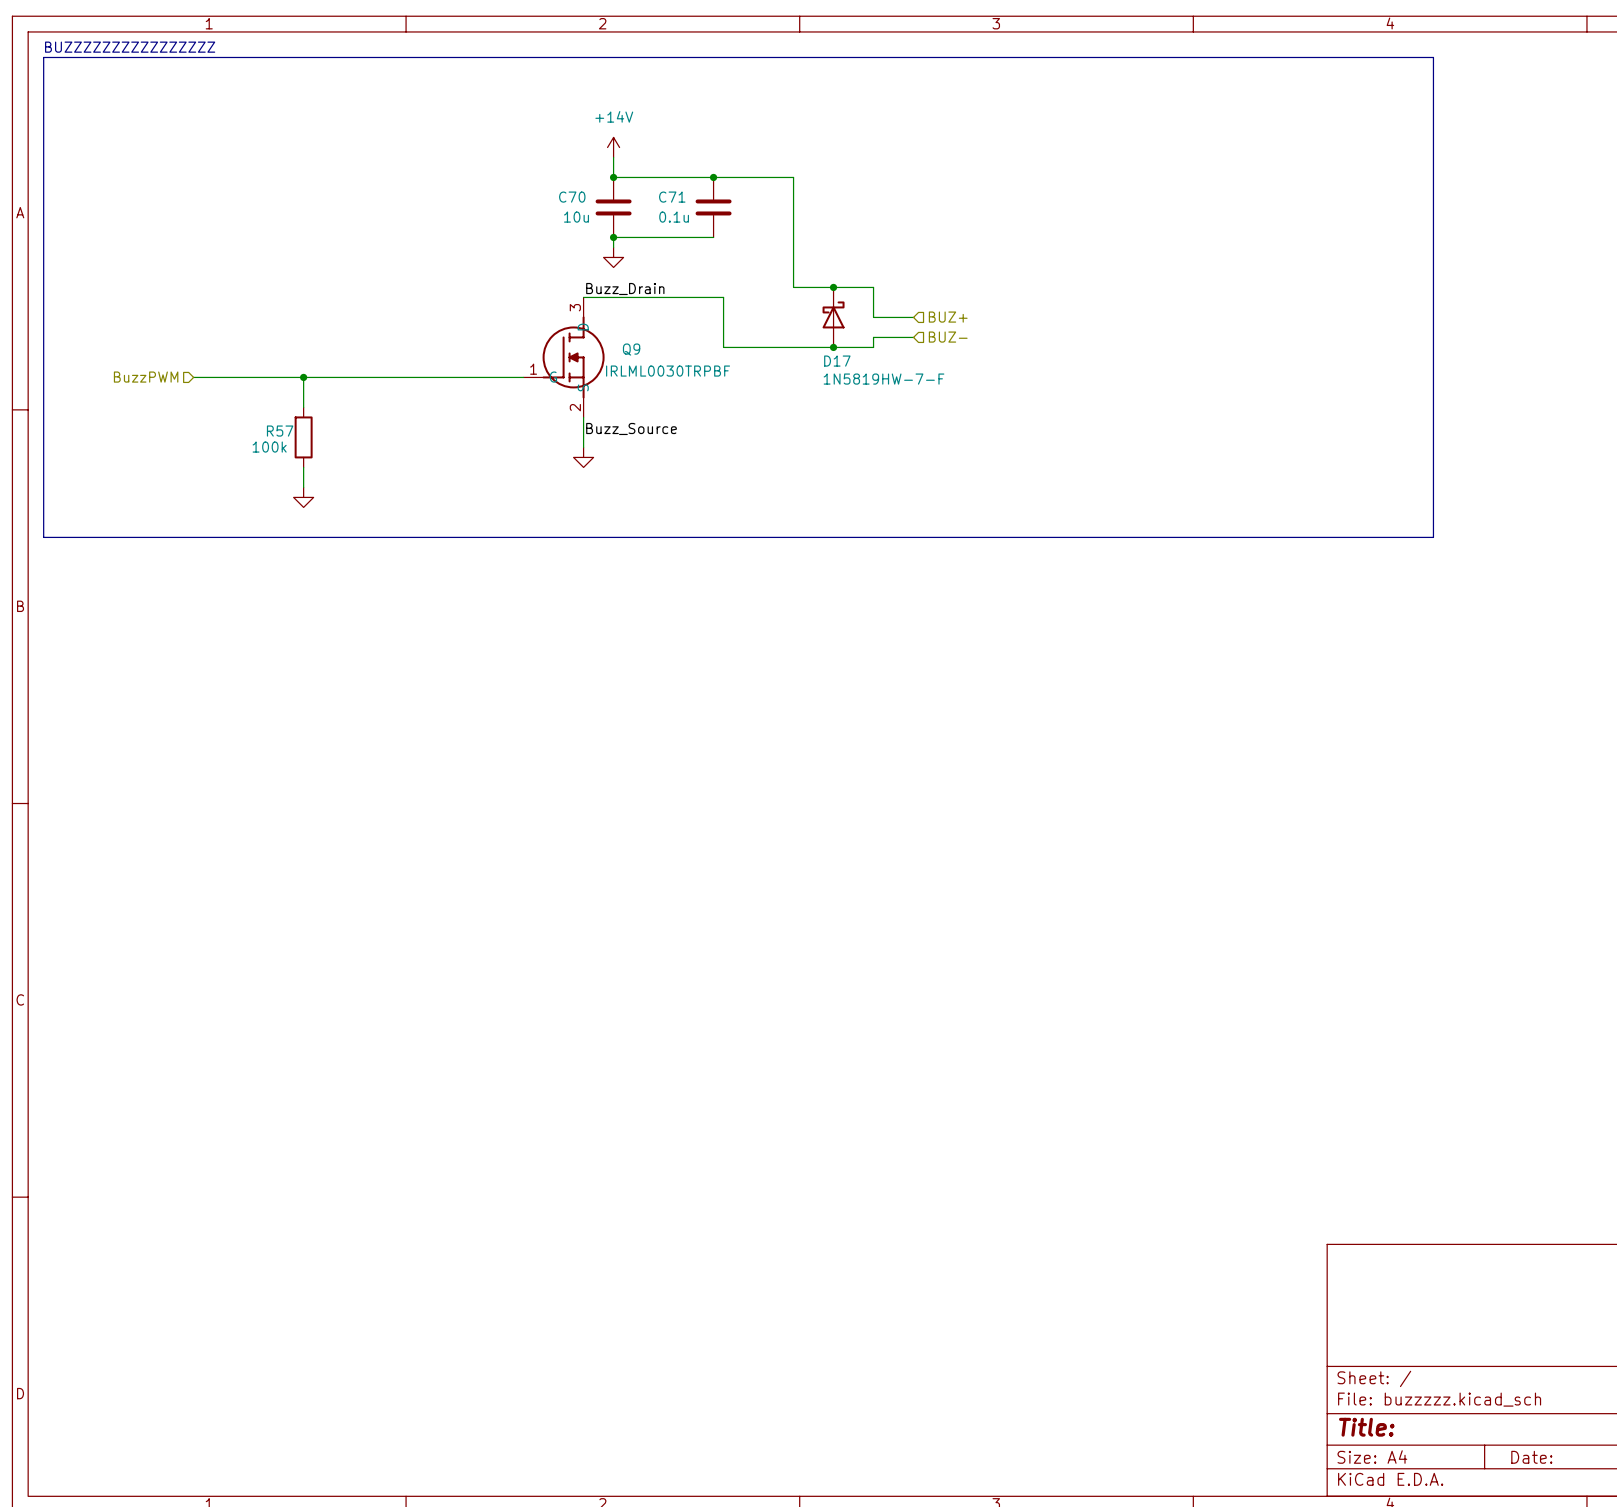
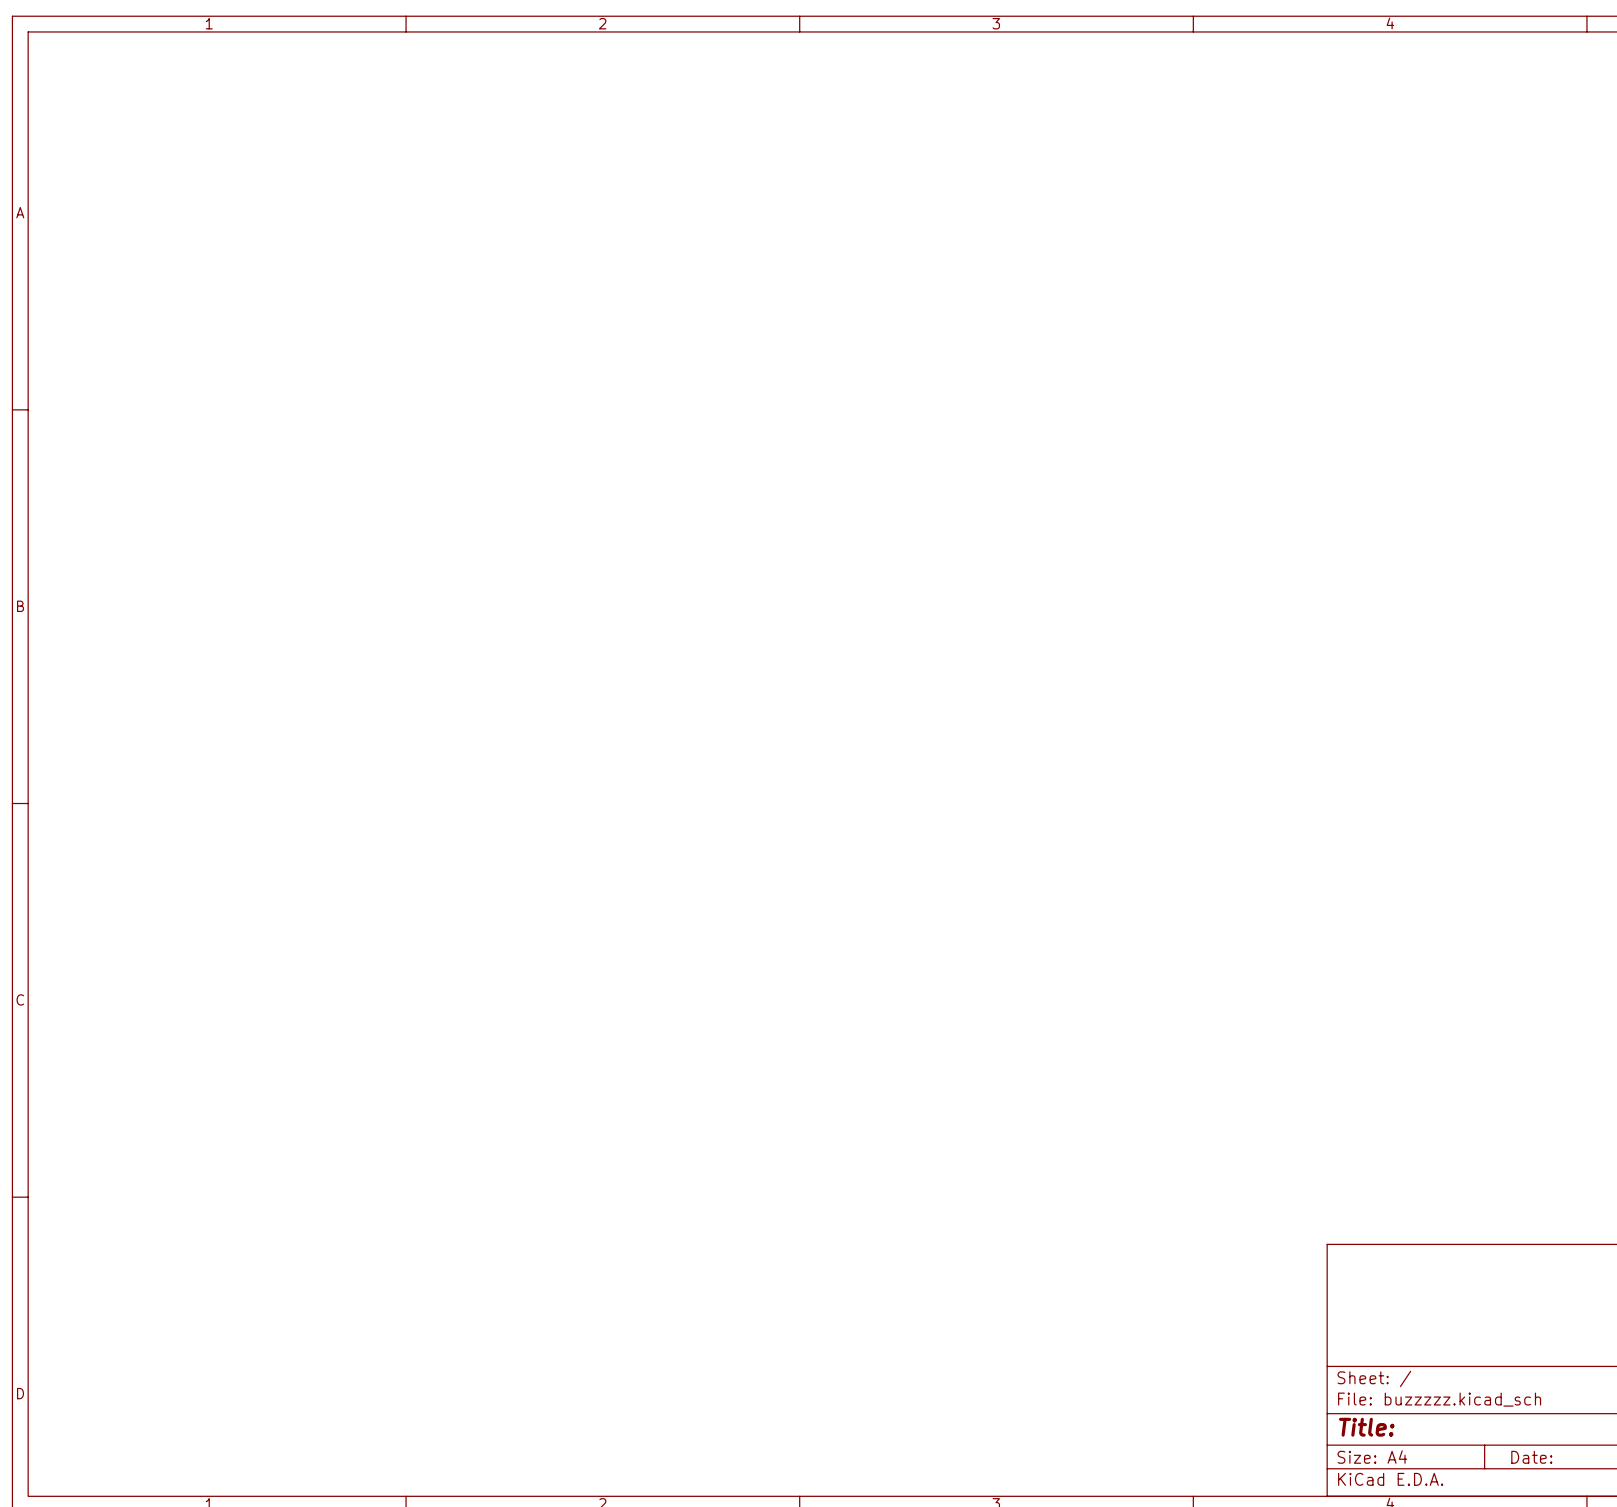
text: BUZZZZZZZZZZZZZZZZ (130, 47) -> none
line: (43, 57) (1433, 57) (1433, 537) (43, 537) (43, 57) -> none
power symbol: +14V (613, 147) -> none
wire: (613, 157) (613, 177) (793, 177) (793, 287) (873, 287) (873, 317) (913, 317) -> none
junction: (613, 177) -> none
junction: (713, 177) -> none
C70: 10u (613, 207) -> none
C71: 0.1u (713, 207) -> none
junction: (613, 237) -> none
wire: (713, 237) (613, 237) (613, 247) -> none
power symbol: (613, 257) -> none
junction: (833, 287) -> none
label: Buzz_Drain (625, 289) -> none
wire: (583, 297) (723, 297) (723, 347) (873, 347) (873, 337) (913, 337) -> none
D17: 1N5819HW-7-F (833, 317) -> none
hierarchical label: BUZ+ (948, 317) -> none
hierarchical label: BUZ- (948, 337) -> none
junction: (833, 347) -> none
Q9: IRLML0030TRPBF (564, 357) -> none
hierarchical label: BuzzPWM (146, 377) -> none
wire: (193, 377) (523, 377) -> none
wire: (303, 377) (303, 407) -> none
junction: (303, 377) -> none
wire: (583, 417) (583, 447) -> none
label: Buzz_Source (631, 428) -> none
R57: 100k (303, 437) -> none
power symbol: (583, 457) -> none
wire: (303, 467) (303, 487) -> none
power symbol: (303, 497) -> none

